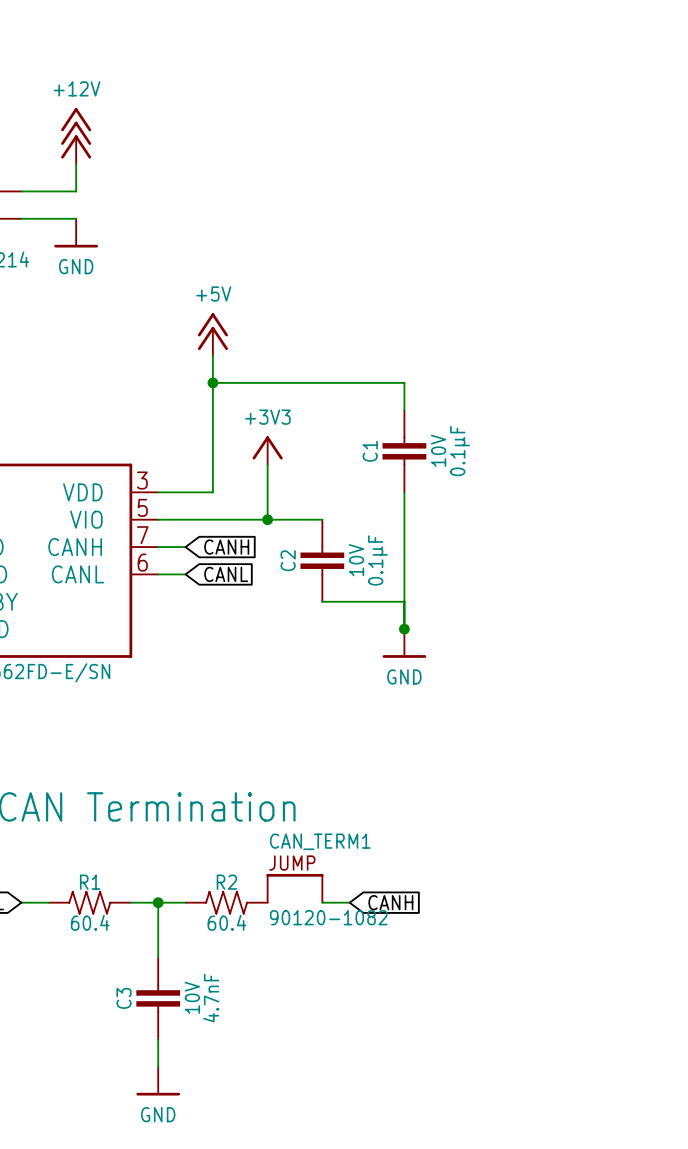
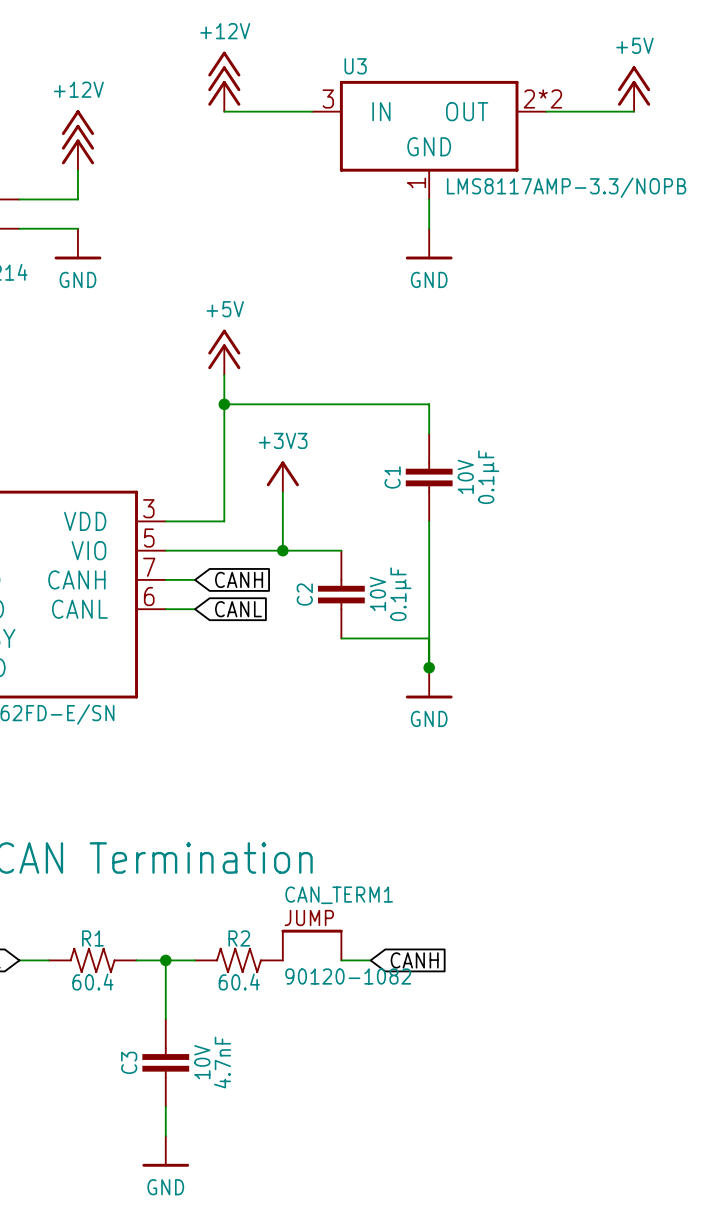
power symbol: none -> +12V (224, 81)
power symbol: none -> +5V (634, 88)
wire: none -> (224, 111) (312, 111)
wire: none -> (546, 111) (634, 111)
U3: none -> (429, 140)
wire: none -> (429, 199) (429, 228)
power symbol: none -> GND (429, 244)

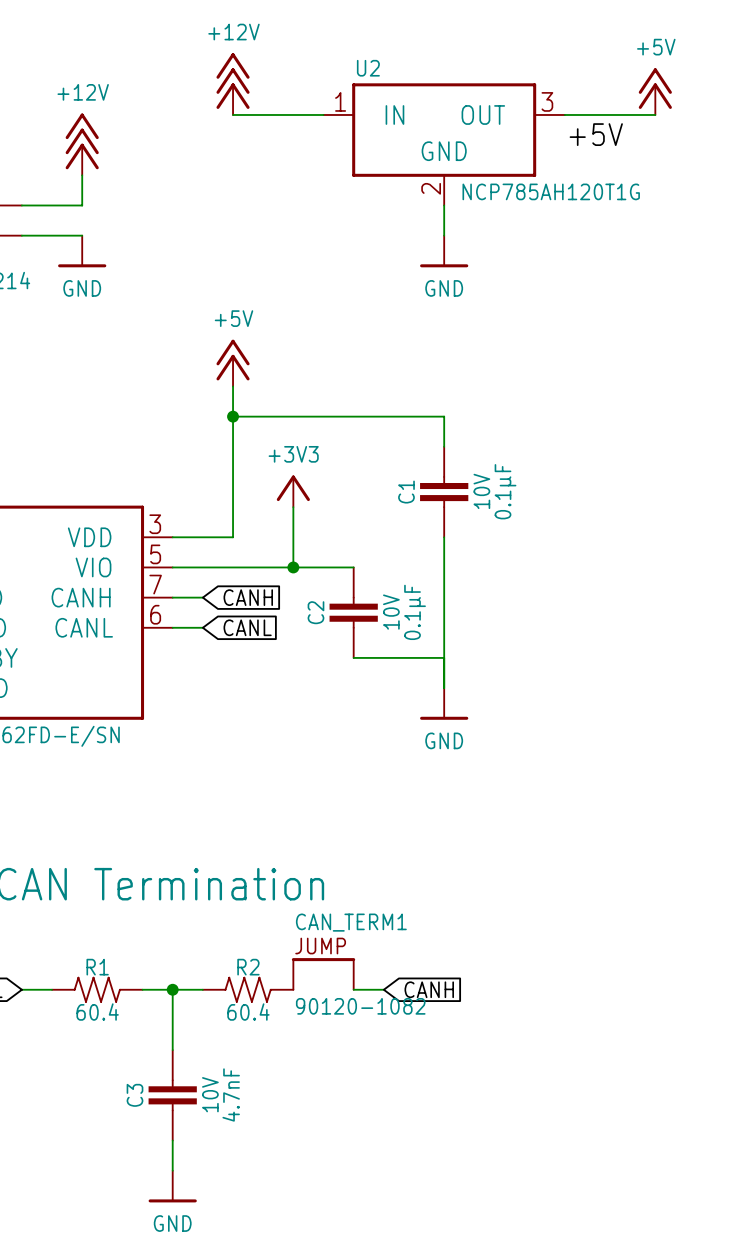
U3 name: U3 (355, 66) -> U2 (368, 68)
U3 pin number: 3 (328, 98) -> 1 (340, 101)
U3 pin number: 2*2 (542, 98) -> 3 (547, 101)
label: none -> +5V (596, 134)
U3 pin number: 1 (416, 182) -> 2 (431, 188)
U3 text: LMS8117AMP-3.3/NOPB (566, 187) -> NCP785AH120T1G (551, 191)
junction: (429, 667) -> none

